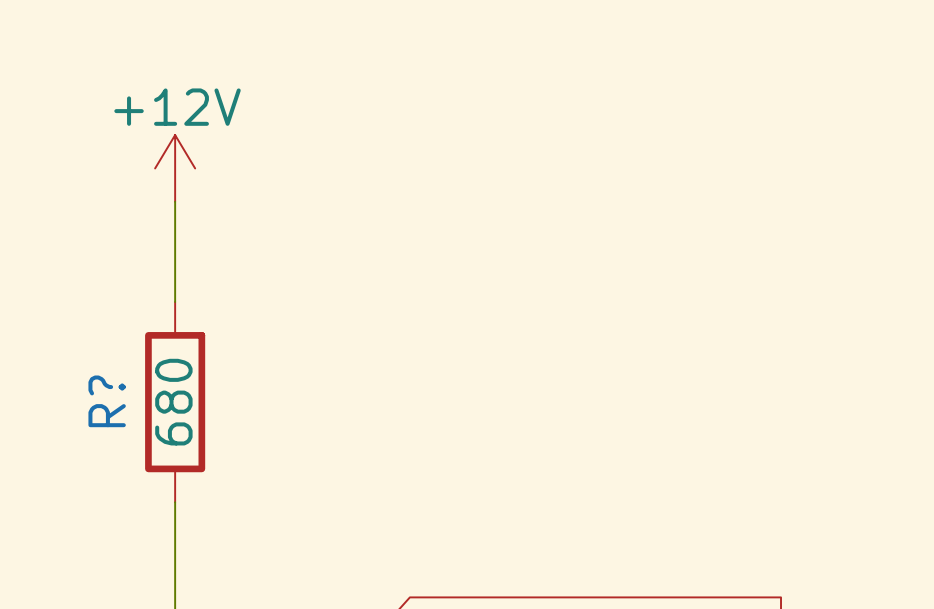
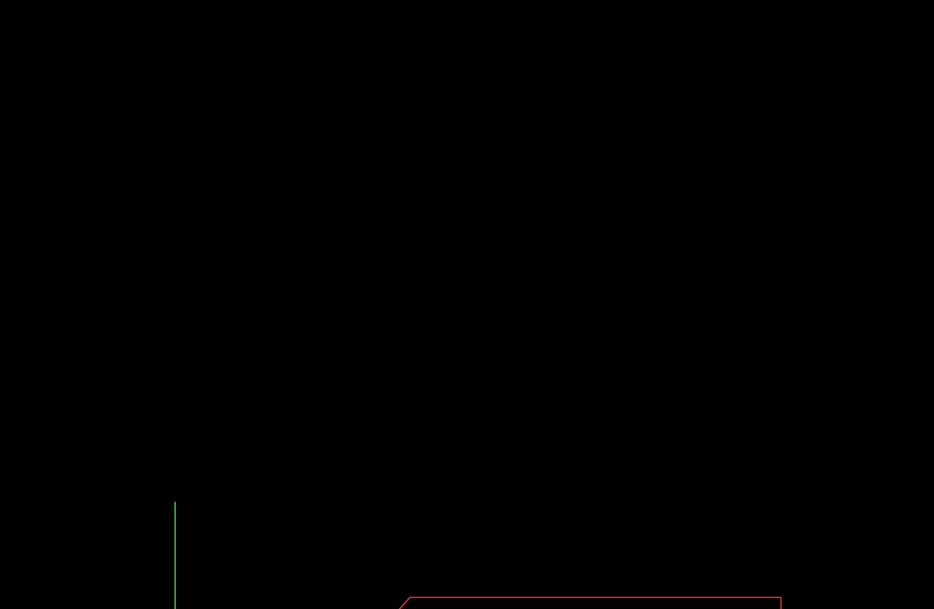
power symbol: +12V (175, 168) -> none
wire: (175, 201) (175, 301) -> none
R?: 680 (175, 402) -> none

